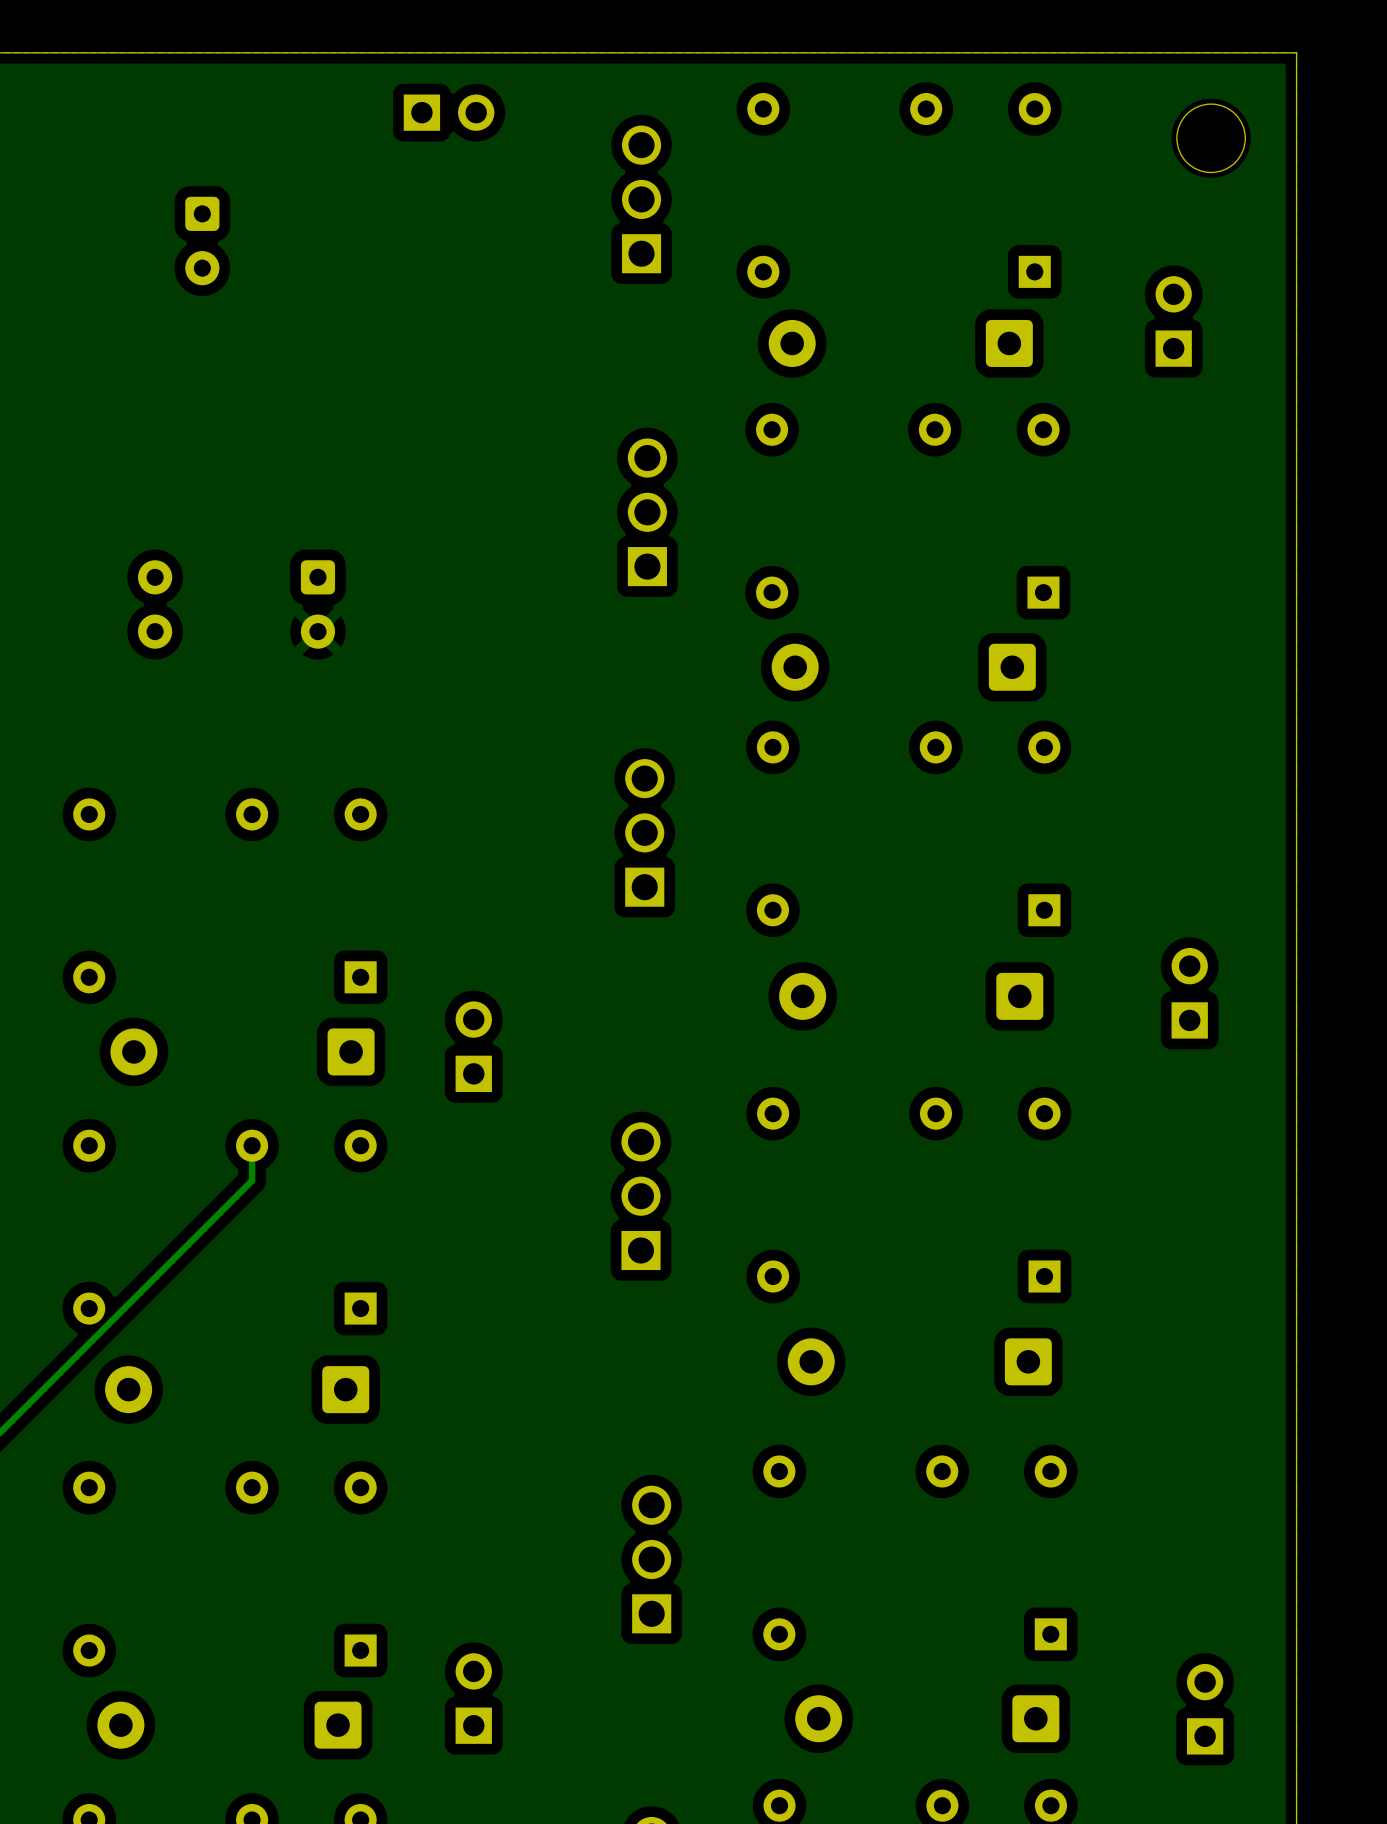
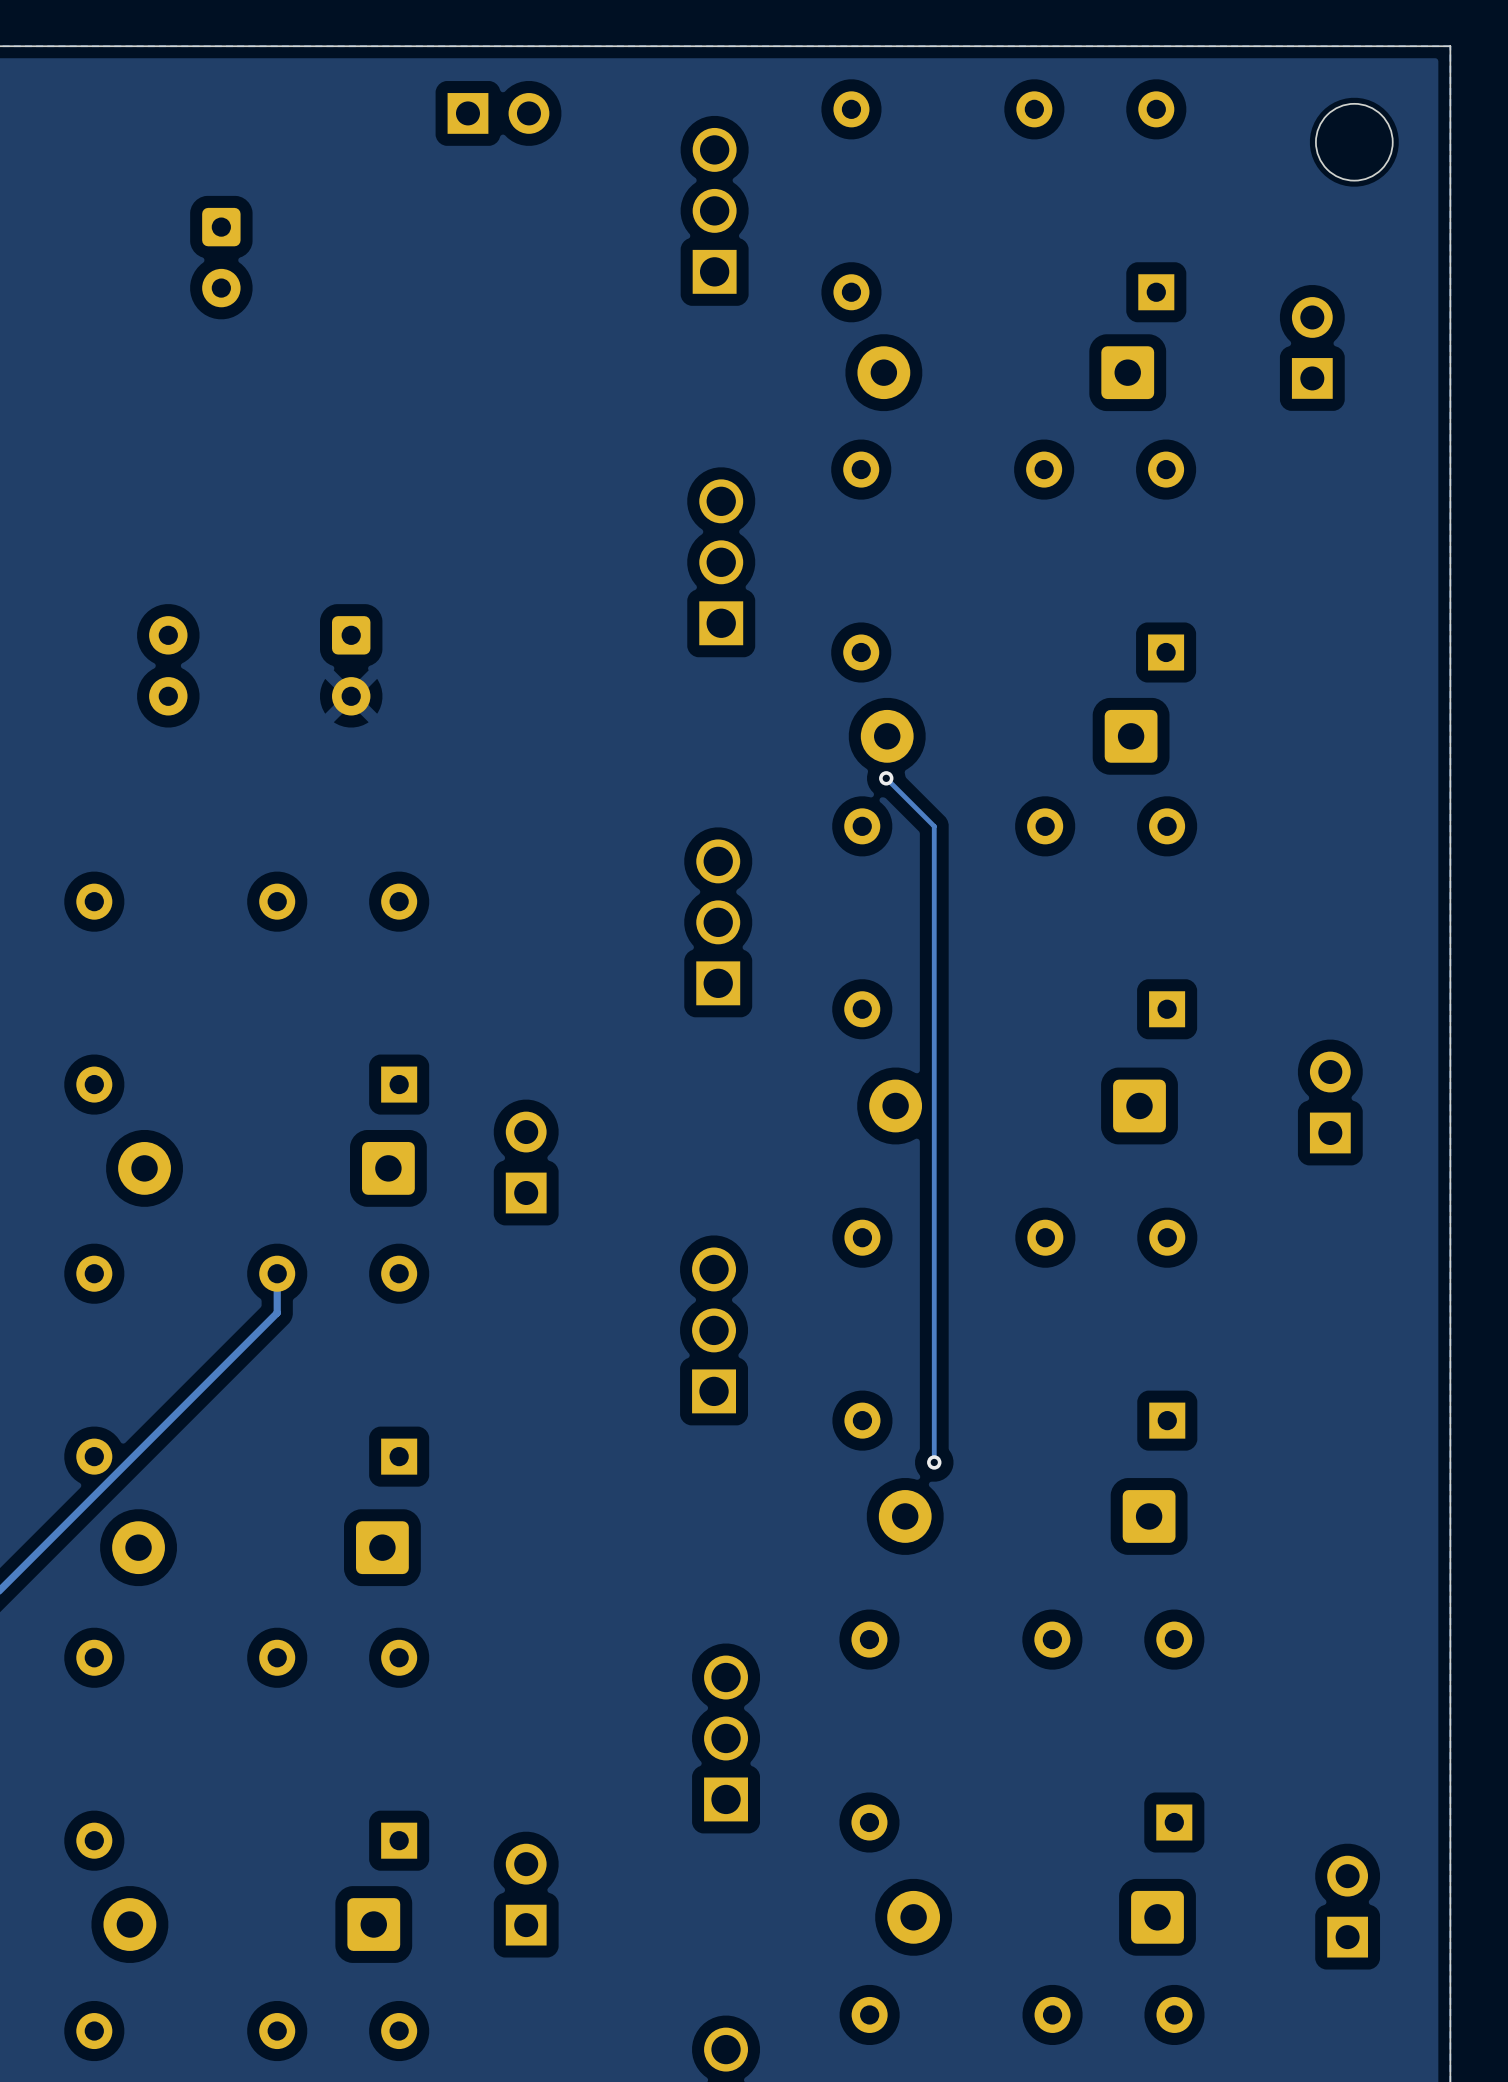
track: none -> (886, 778) (934, 826) (934, 1462)
via: none -> (886, 778)
via: none -> (934, 1462)

